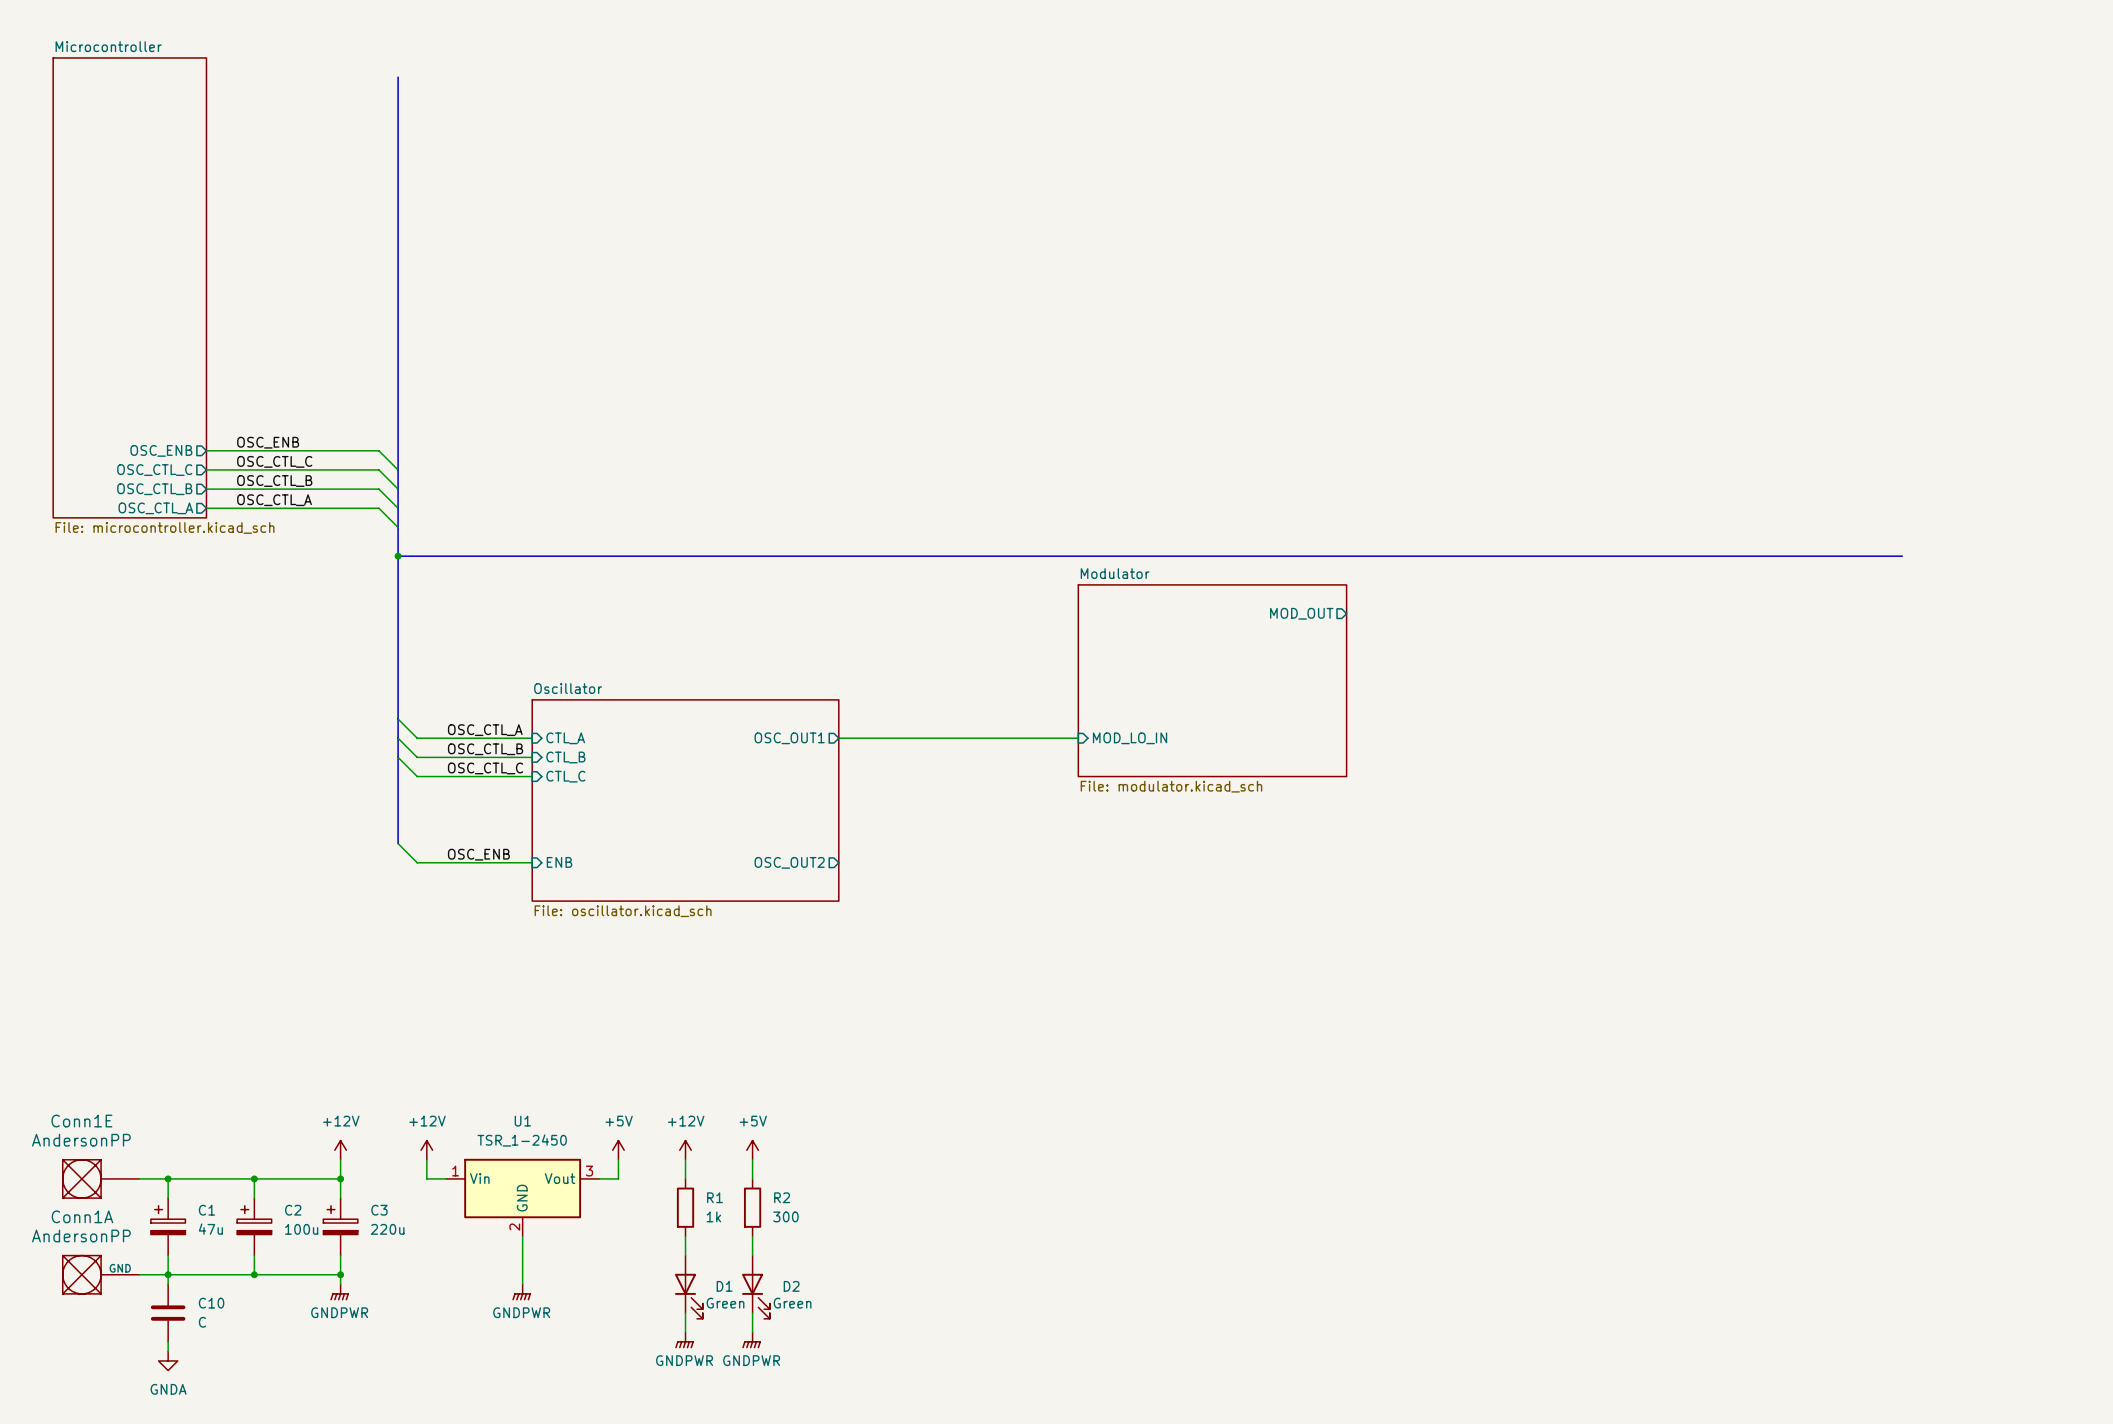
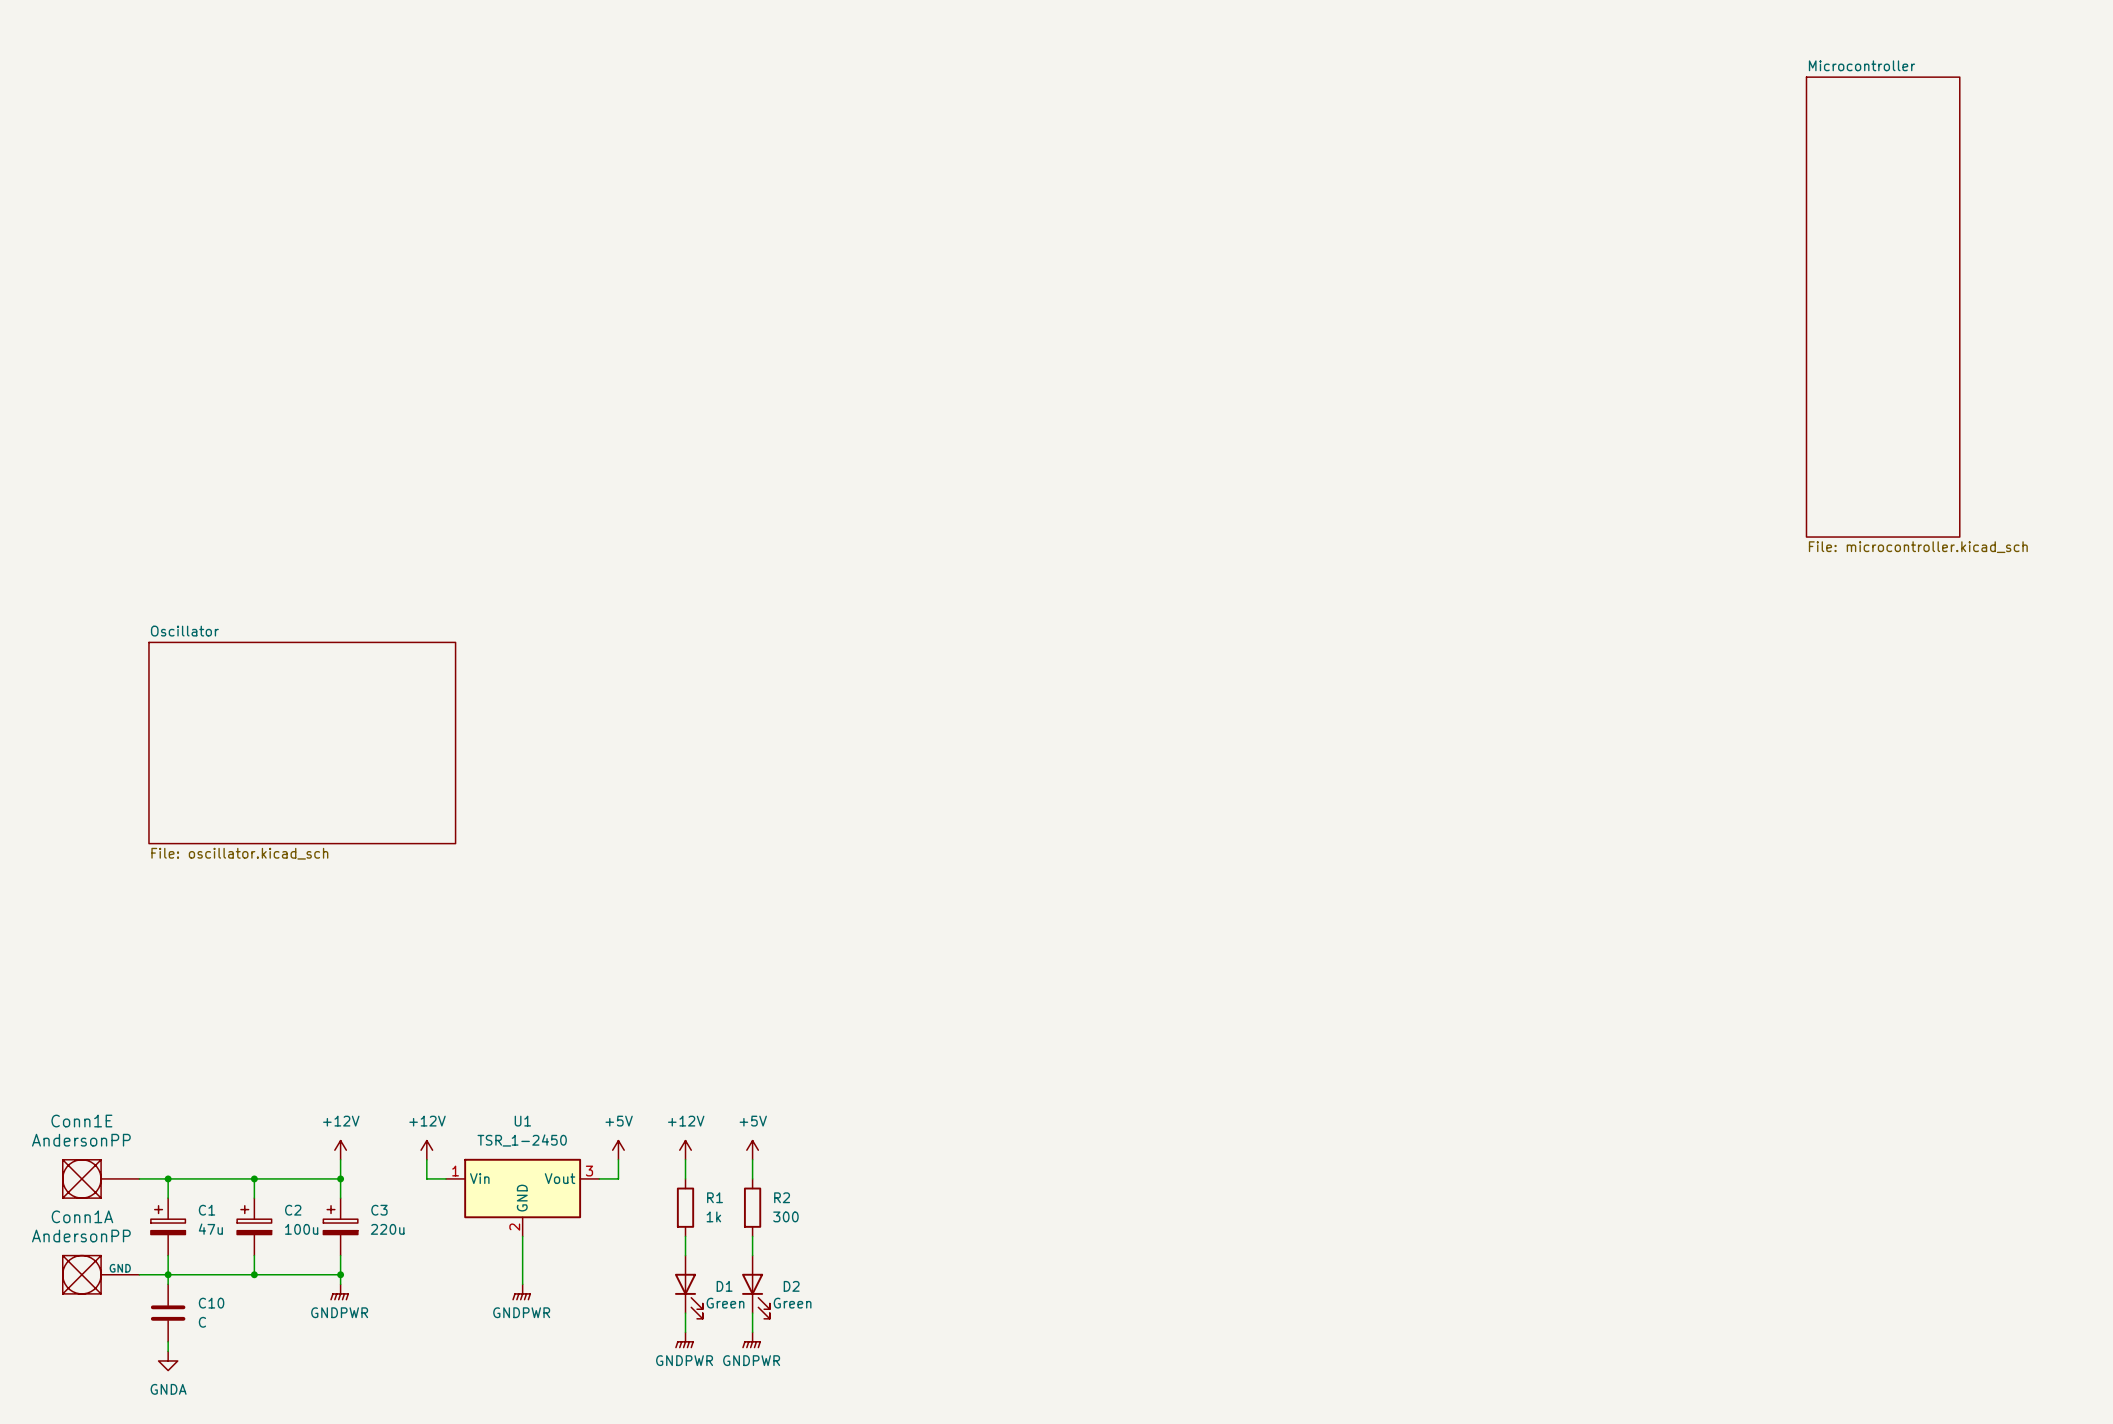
bus: (398, 77) (398, 843) -> none
sheet Microcontroller: File: microcontroller.kicad_sch (129, 287) -> none
sheet Microcontroller: none -> File: microcontroller.kicad_sch (1883, 307)
label: OSC_ENB (268, 442) -> none
sheet pin: OSC_ENB (161, 450) -> none
wire: (206, 450) (378, 450) (398, 469) -> none
label: OSC_CTL_C (274, 461) -> none
wire: (206, 469) (378, 469) (398, 489) -> none
sheet pin: OSC_CTL_C (154, 470) -> none
label: OSC_CTL_B (274, 481) -> none
sheet pin: OSC_CTL_B (154, 489) -> none
wire: (206, 489) (378, 489) (398, 508) -> none
label: OSC_CTL_A (274, 500) -> none
sheet pin: OSC_CTL_A (155, 508) -> none
wire: (206, 508) (378, 508) (398, 527) -> none
bus: (398, 556) (1902, 556) -> none
junction: (398, 556) -> none
sheet pin: MOD_OUT (1301, 613) -> none
sheet Modulator: File: modulator.kicad_sch (1212, 680) -> none
wire: (398, 719) (417, 738) (532, 738) -> none
label: OSC_CTL_A (485, 730) -> none
wire: (398, 738) (417, 757) (532, 757) -> none
sheet pin: CTL_A (565, 738) -> none
sheet pin: OSC_OUT1 (789, 738) -> none
wire: (838, 738) (1078, 738) -> none
sheet pin: MOD_LO_IN (1130, 738) -> none
sheet Oscillator: none -> File: oscillator.kicad_sch (302, 743)
label: OSC_CTL_B (485, 749) -> none
wire: (398, 757) (417, 776) (532, 776) -> none
sheet pin: CTL_B (565, 757) -> none
label: OSC_CTL_C (485, 768) -> none
sheet pin: CTL_C (565, 776) -> none
sheet Oscillator: File: oscillator.kicad_sch (685, 800) -> none
wire: (398, 843) (417, 862) (532, 862) -> none
label: OSC_ENB (478, 854) -> none
sheet pin: ENB (559, 862) -> none
sheet pin: OSC_OUT2 (789, 862) -> none

